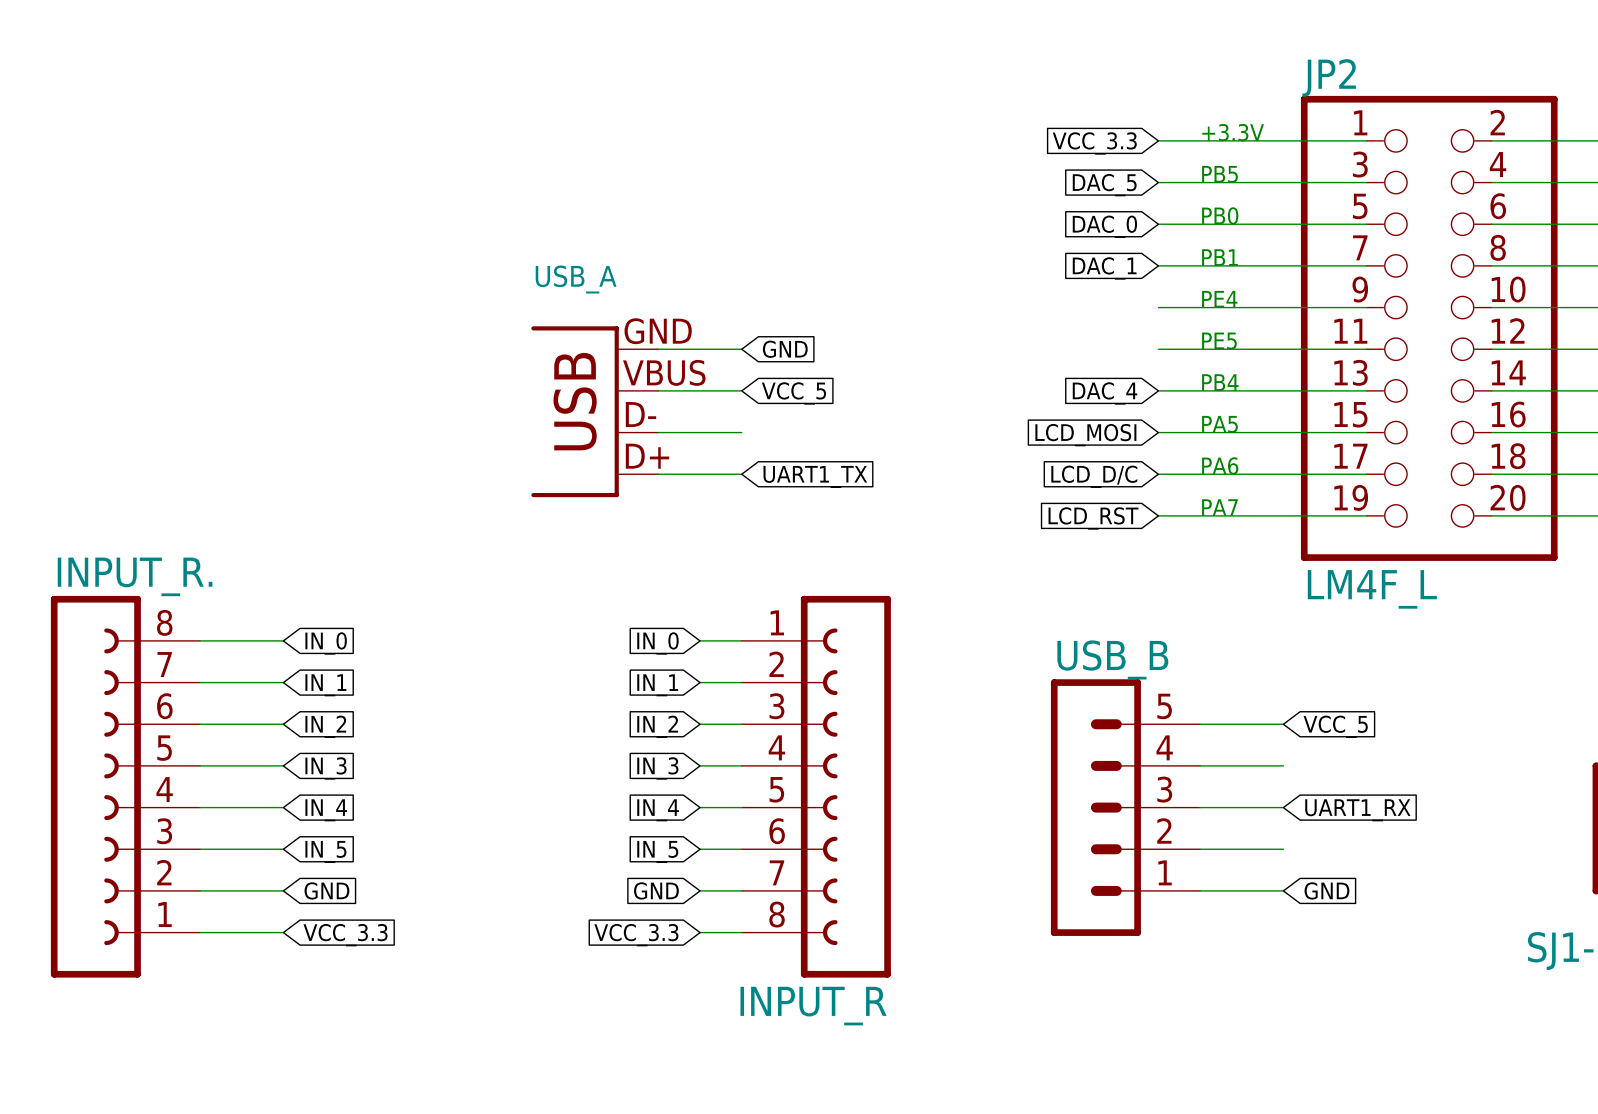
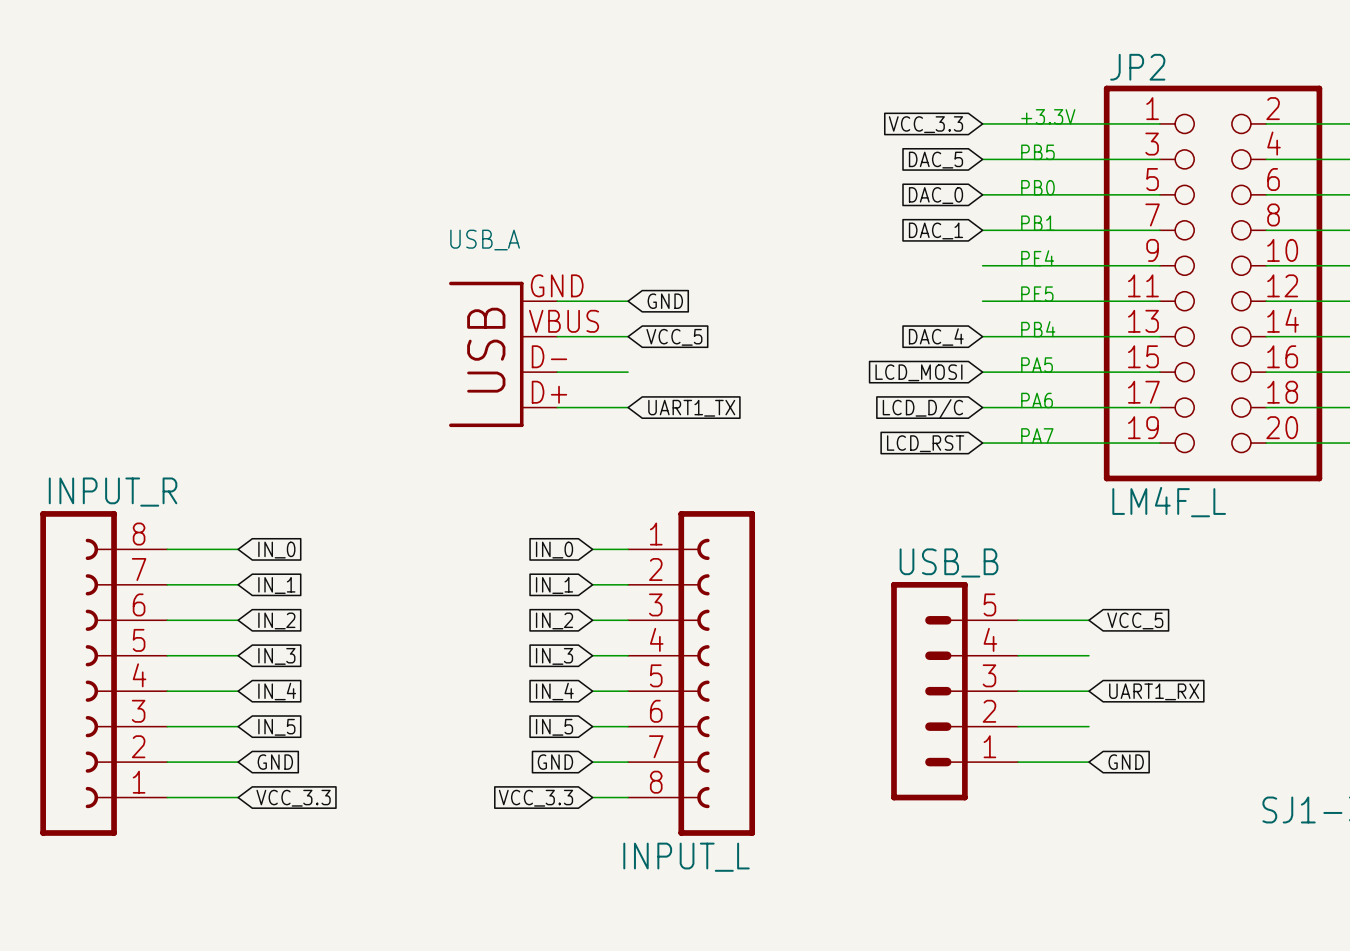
INPUT_R. name: INPUT_R. (135, 576) -> INPUT_R (113, 492)
INPUT_R name: INPUT_R (813, 1006) -> INPUT_L (686, 857)

